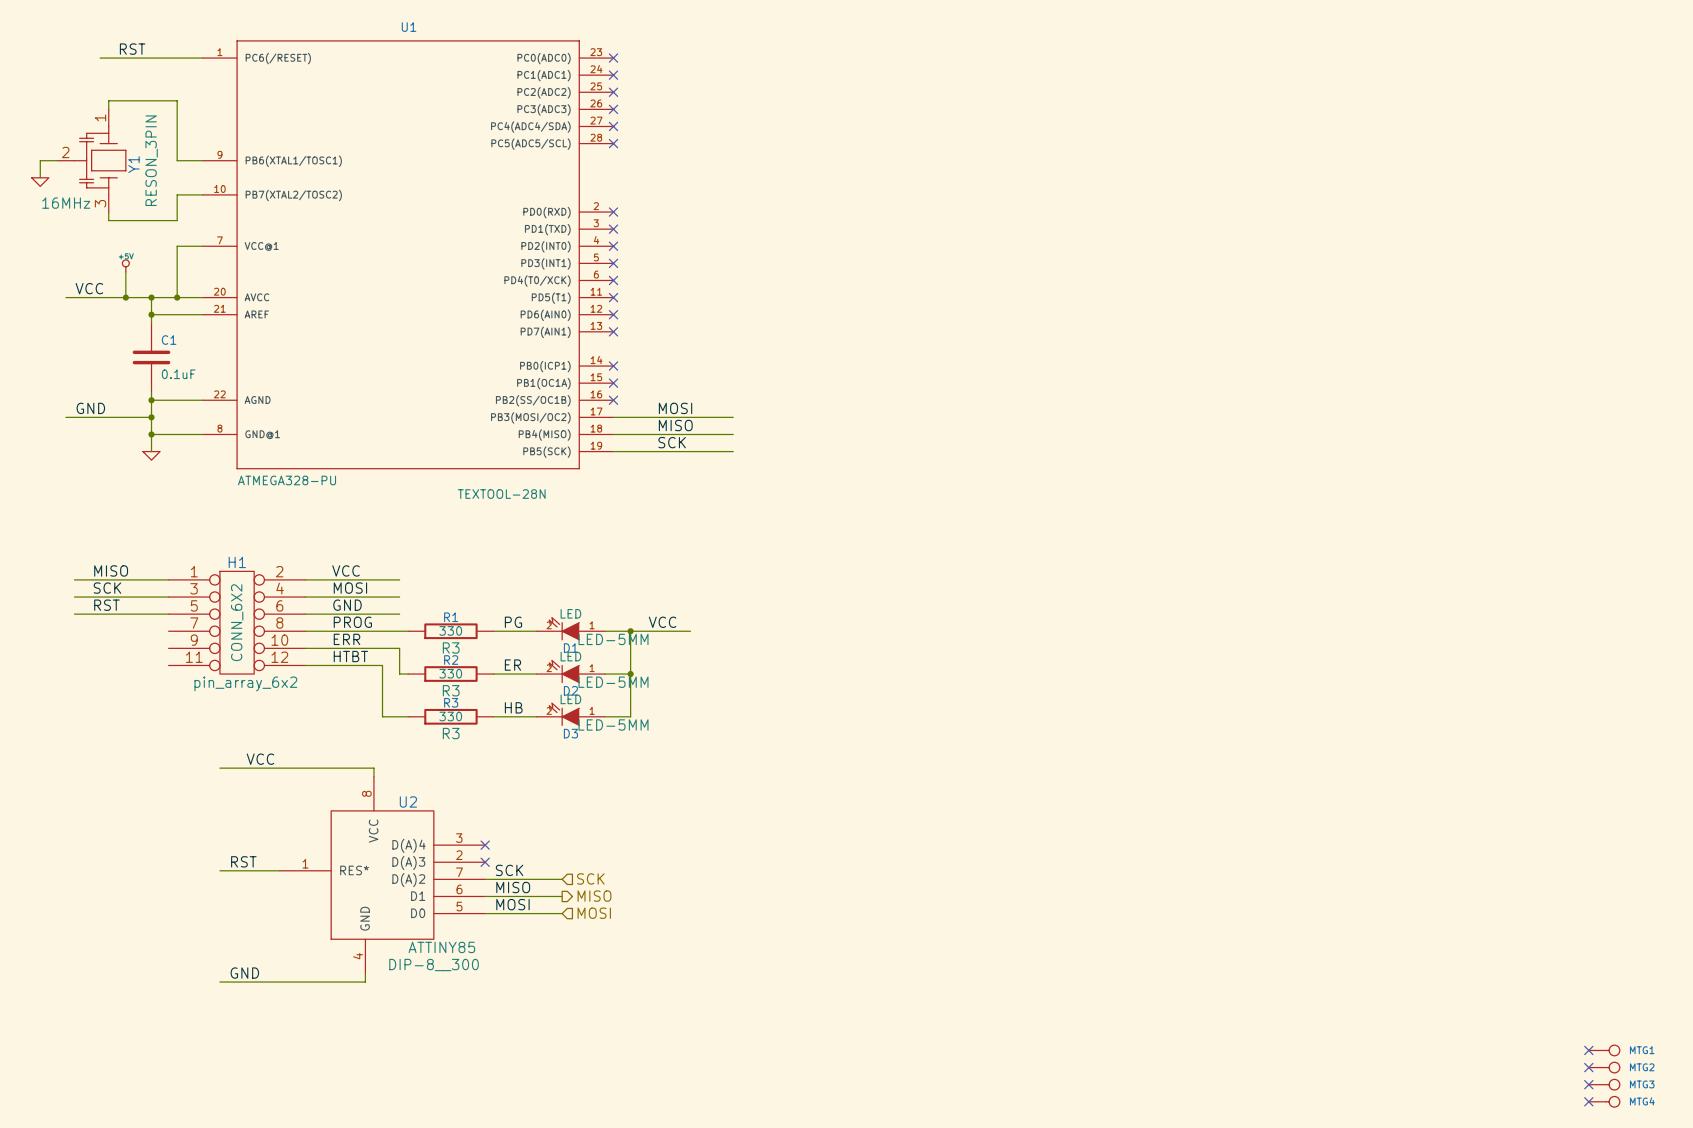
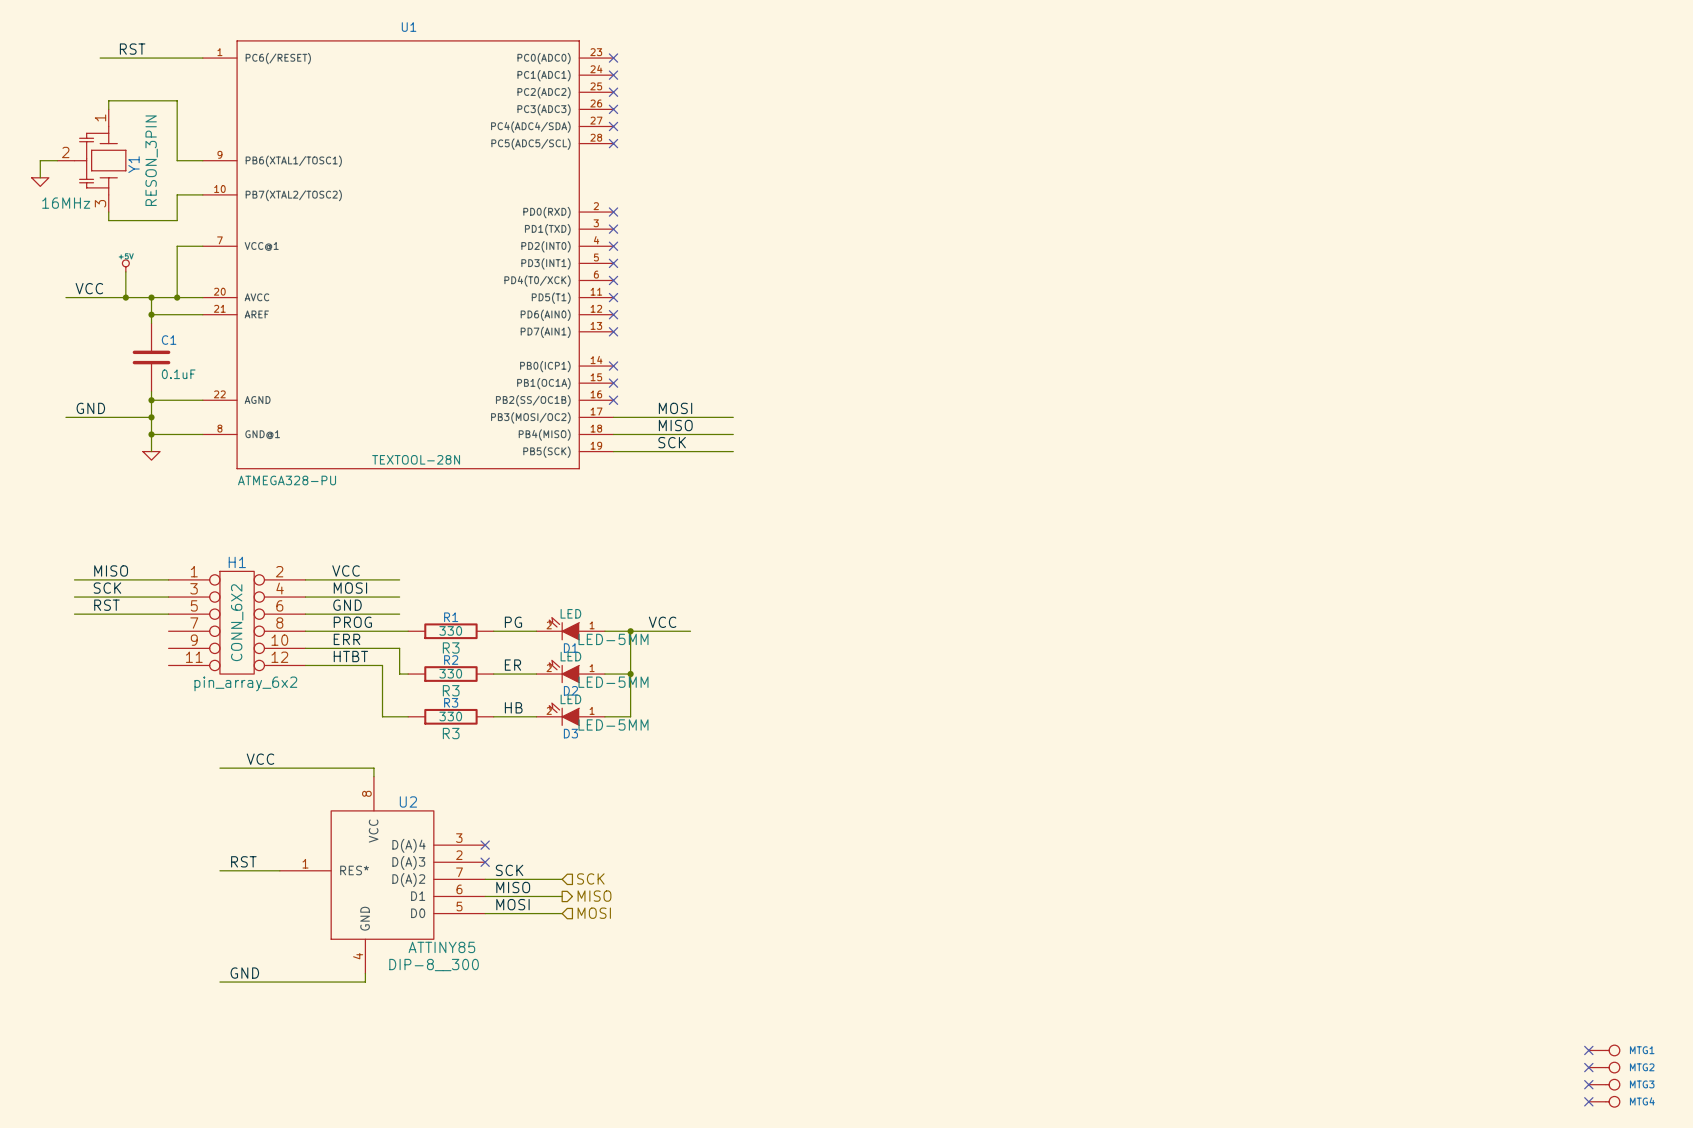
U1 text position: TEXTOOL-28N (501, 494) -> TEXTOOL-28N (416, 459)

